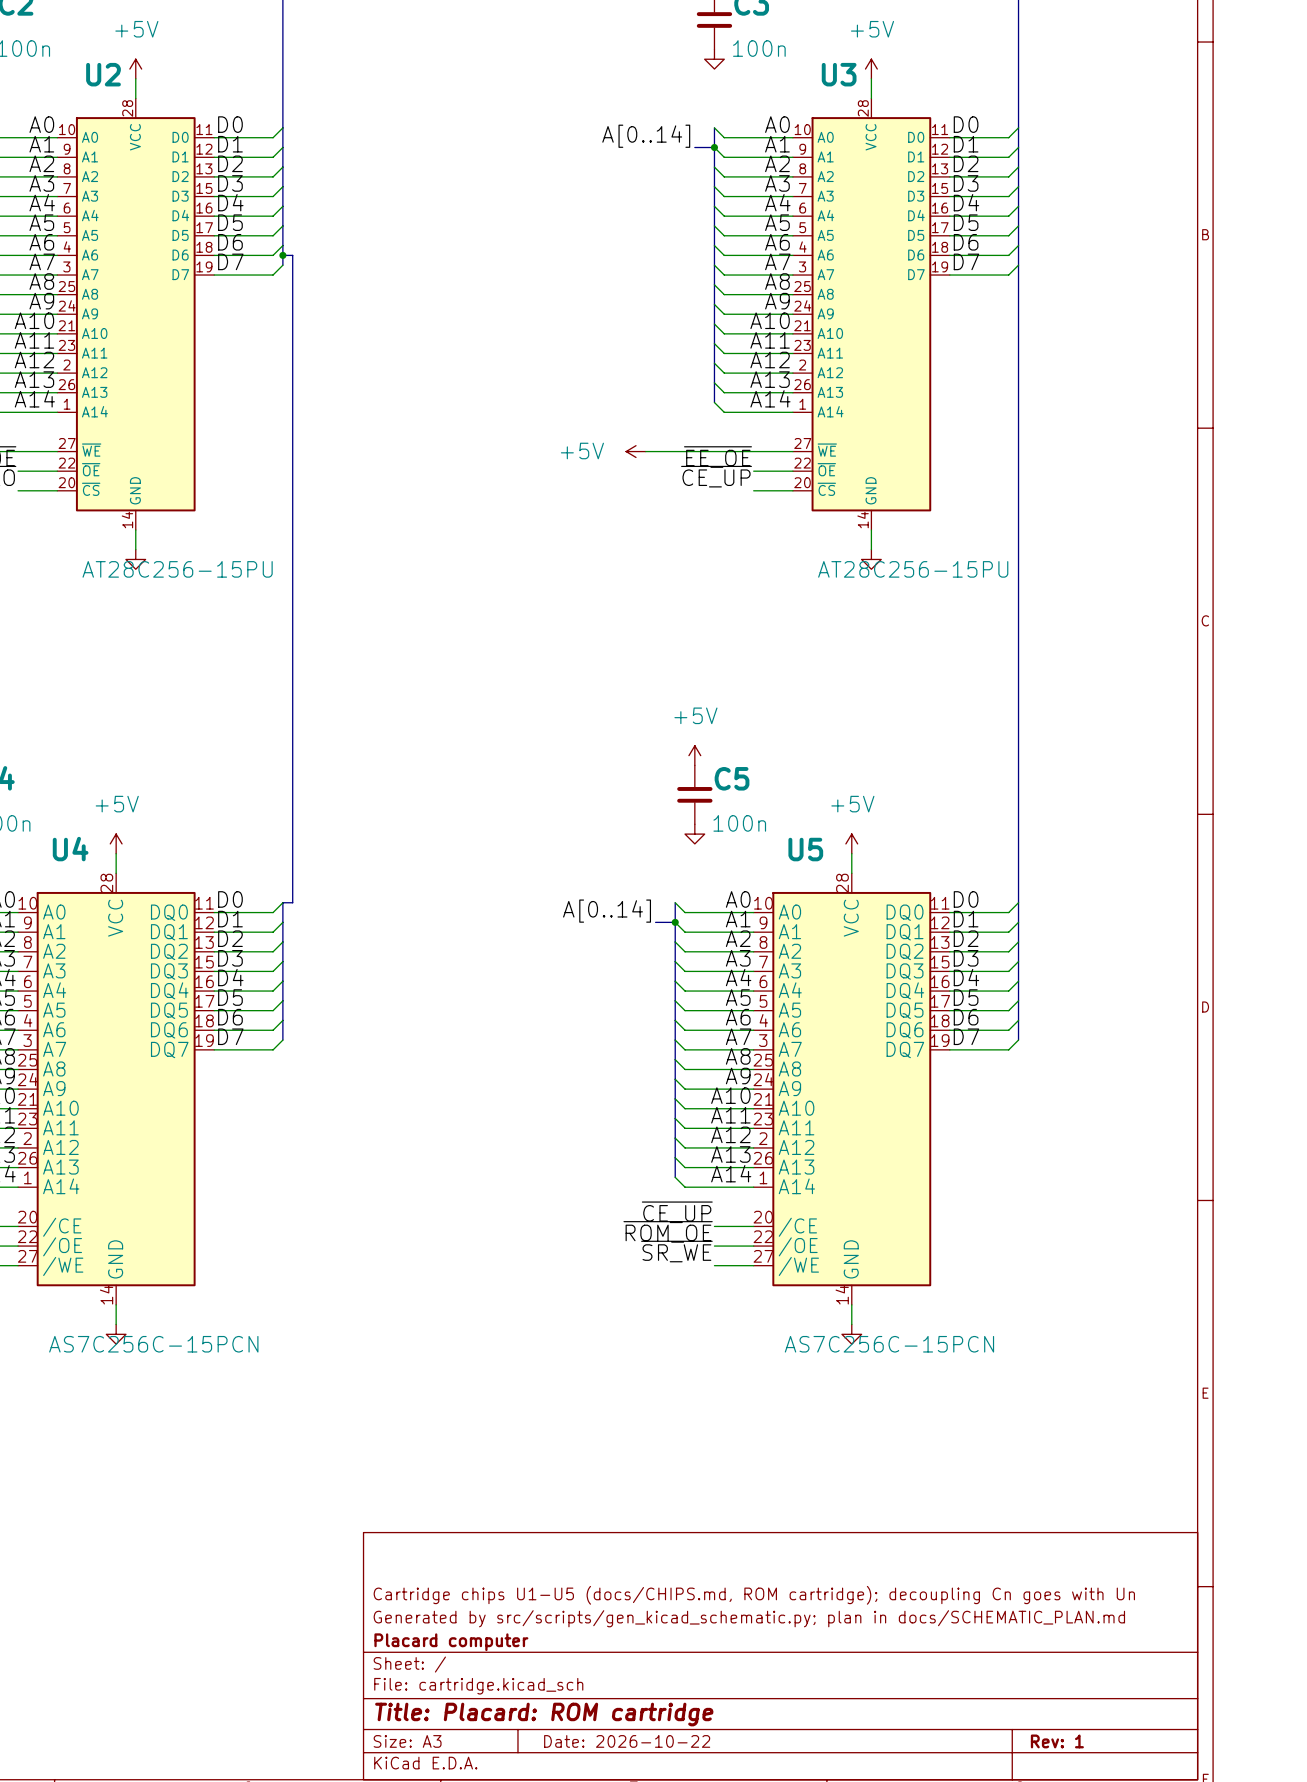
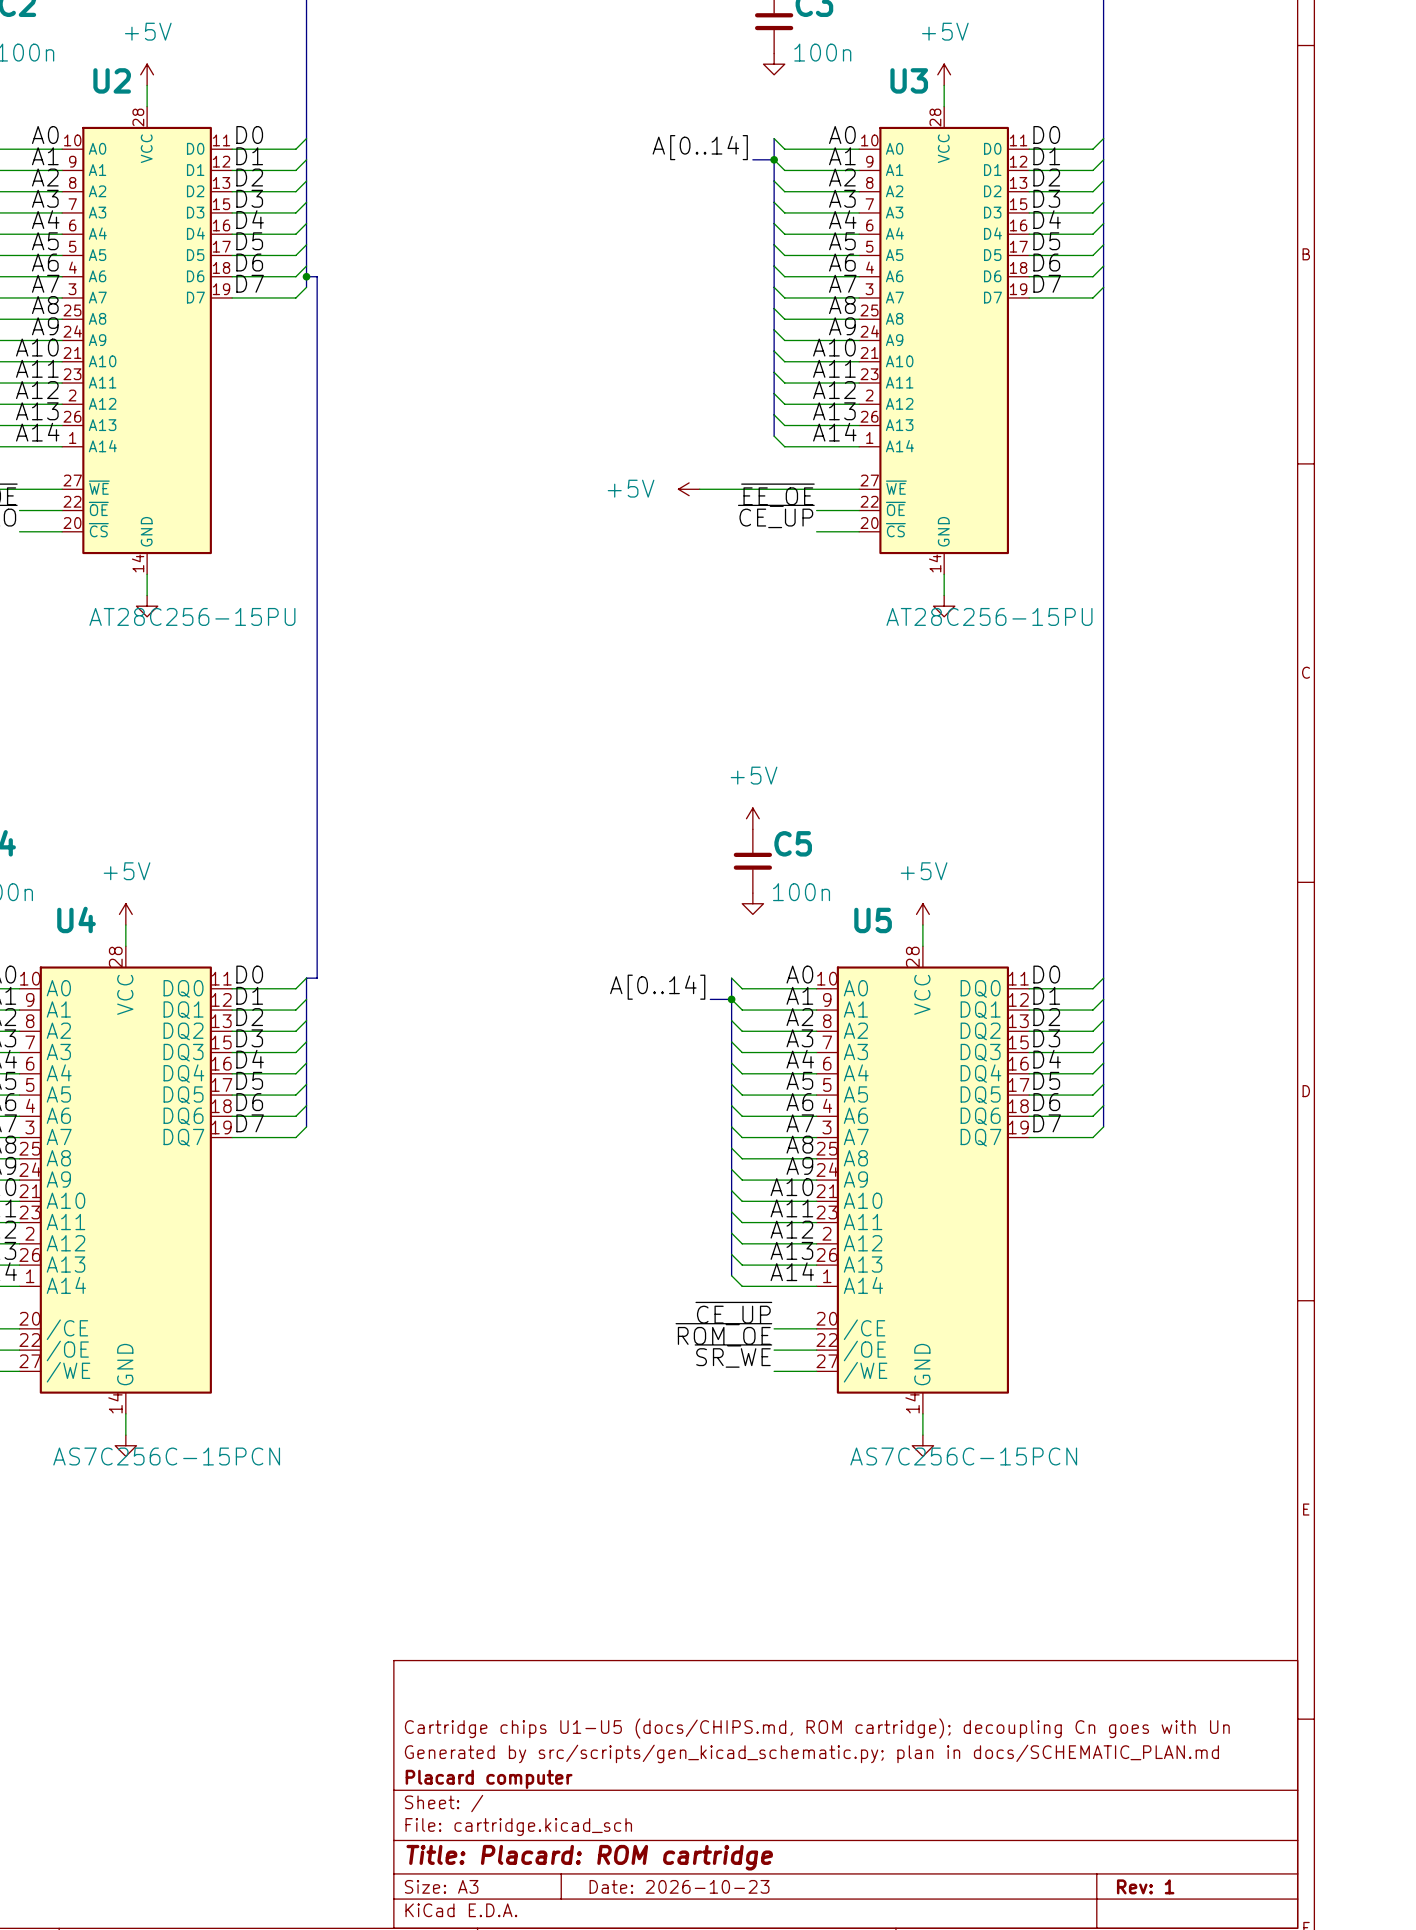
title block: Date: 2026-10-22 (627, 1741) -> Date: 2026-10-23 (679, 1886)

